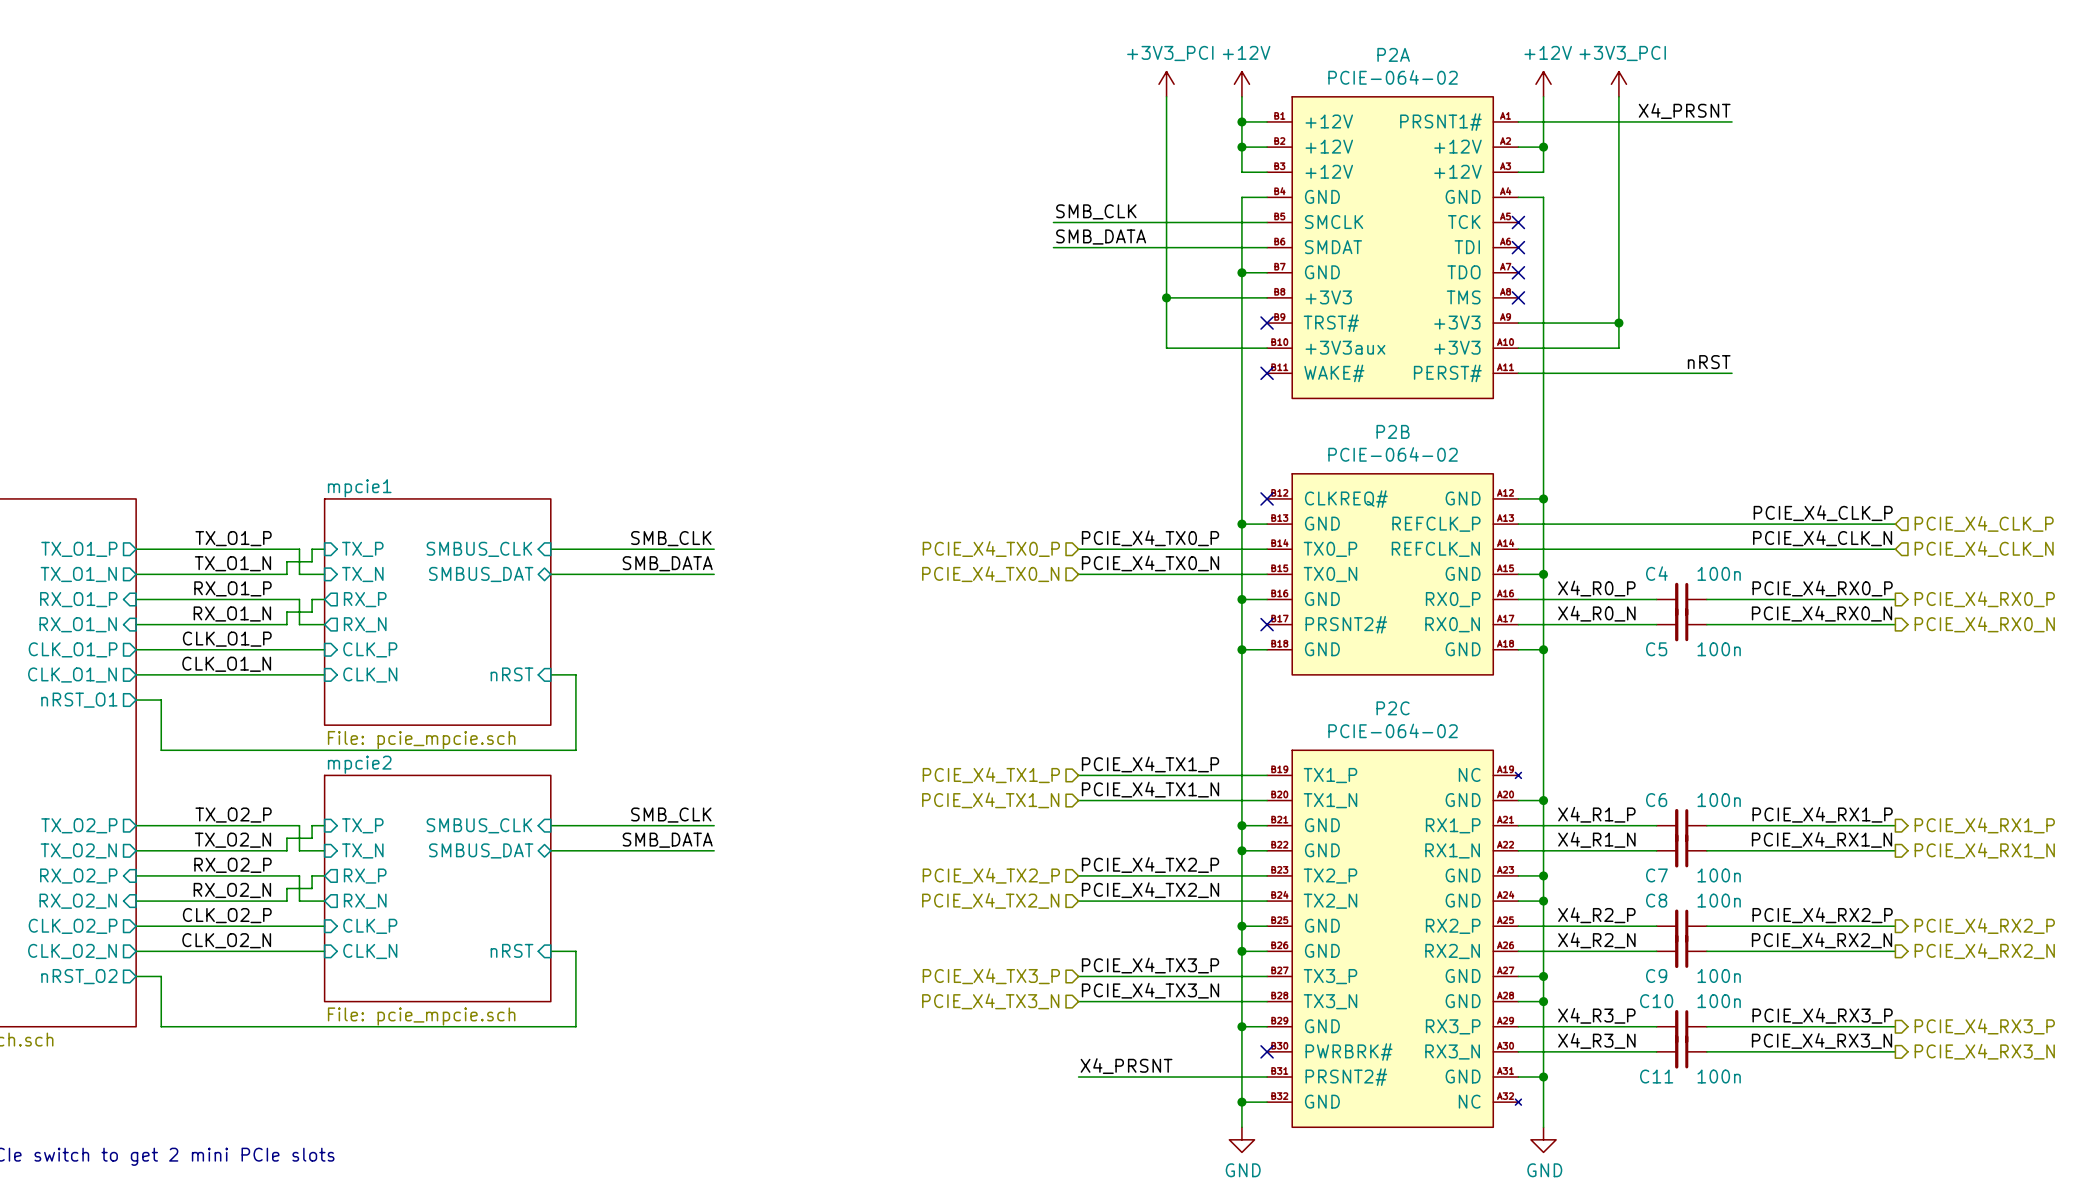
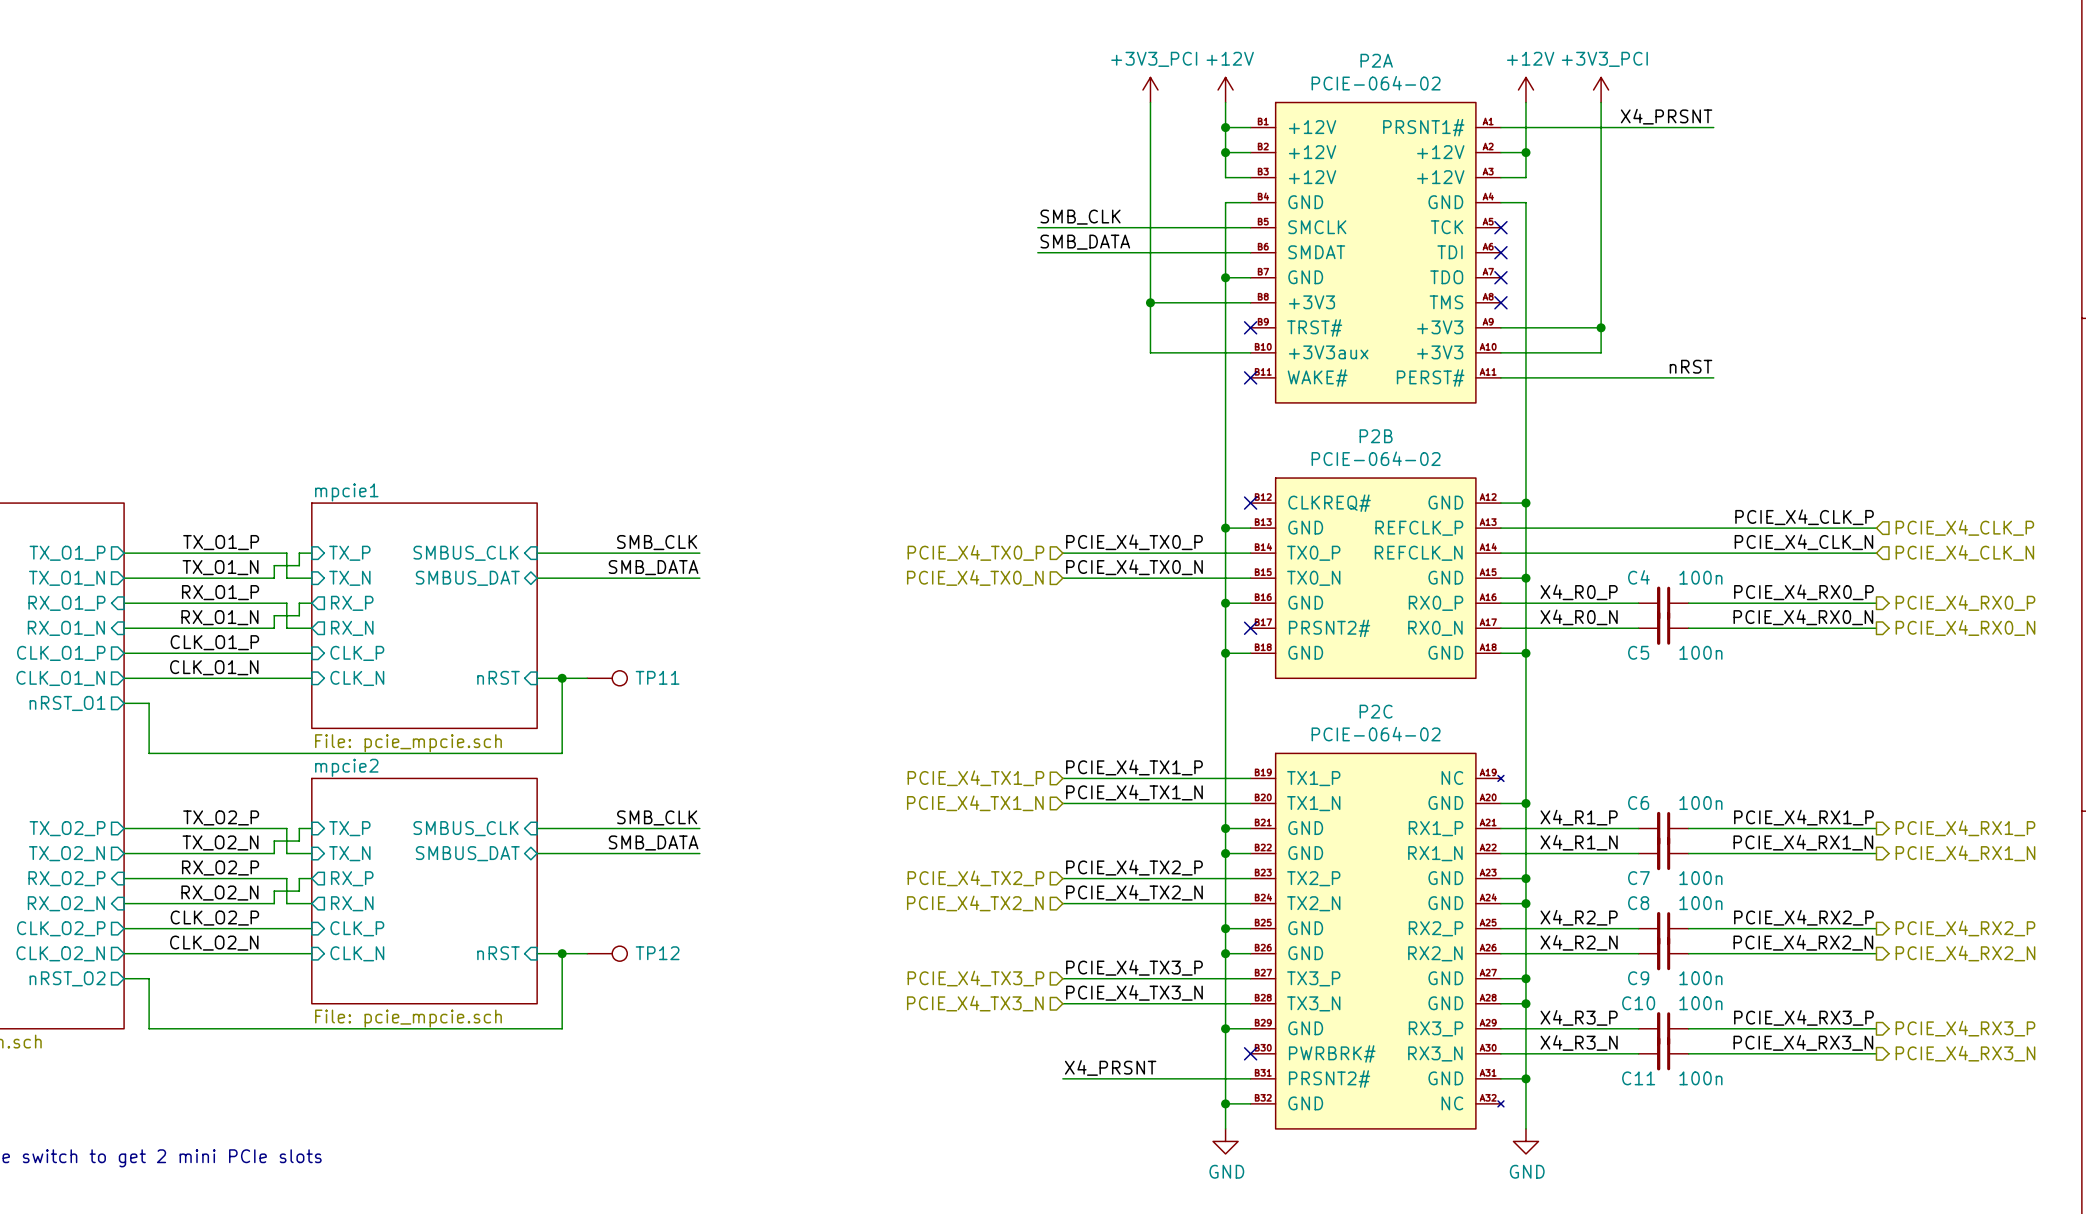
wire: none -> (562, 678) (587, 678)
junction: none -> (562, 678)
TP11: none -> (607, 678)
wire: none -> (562, 953) (587, 953)
junction: none -> (562, 953)
TP12: none -> (607, 953)

